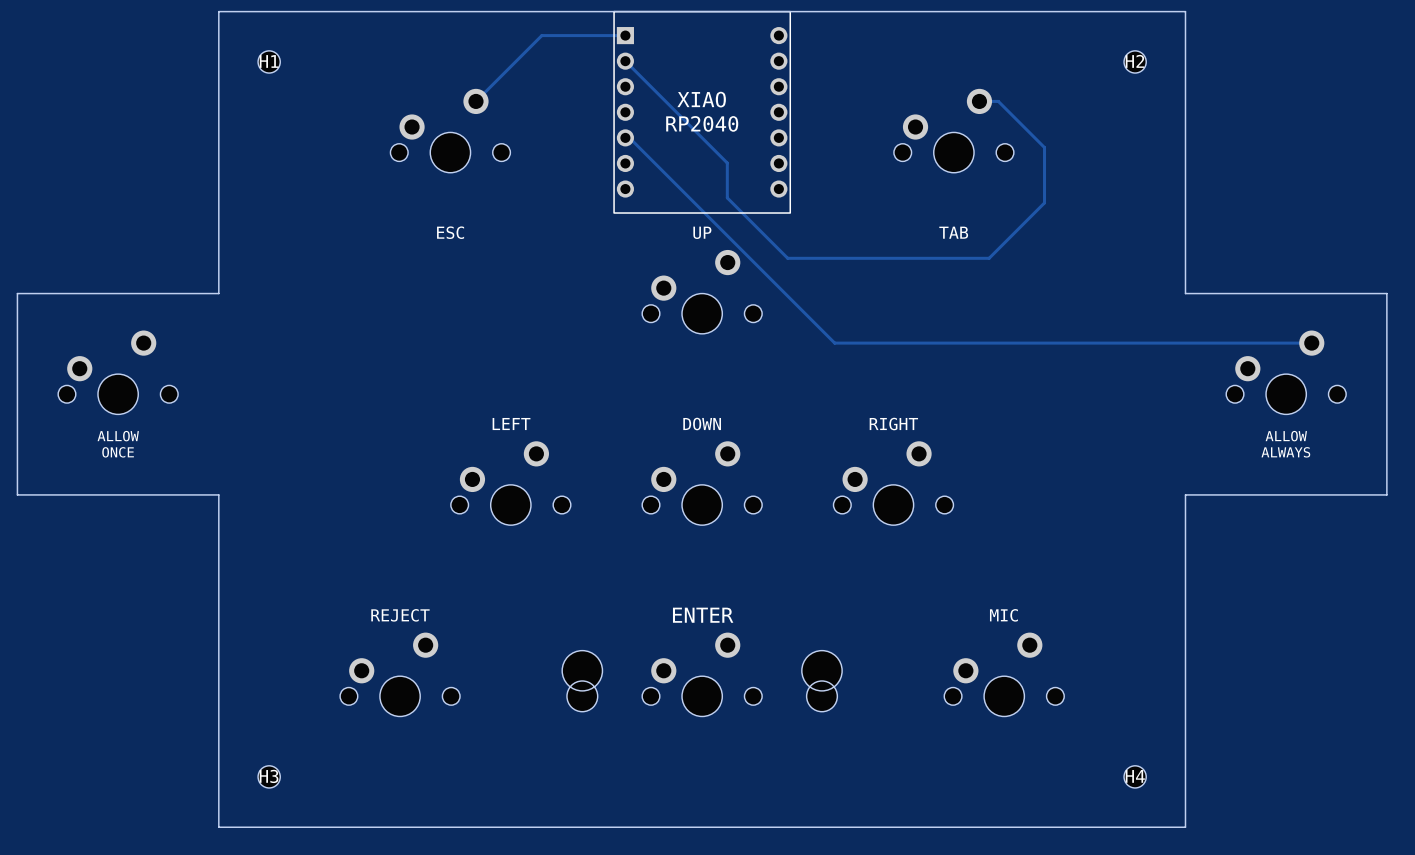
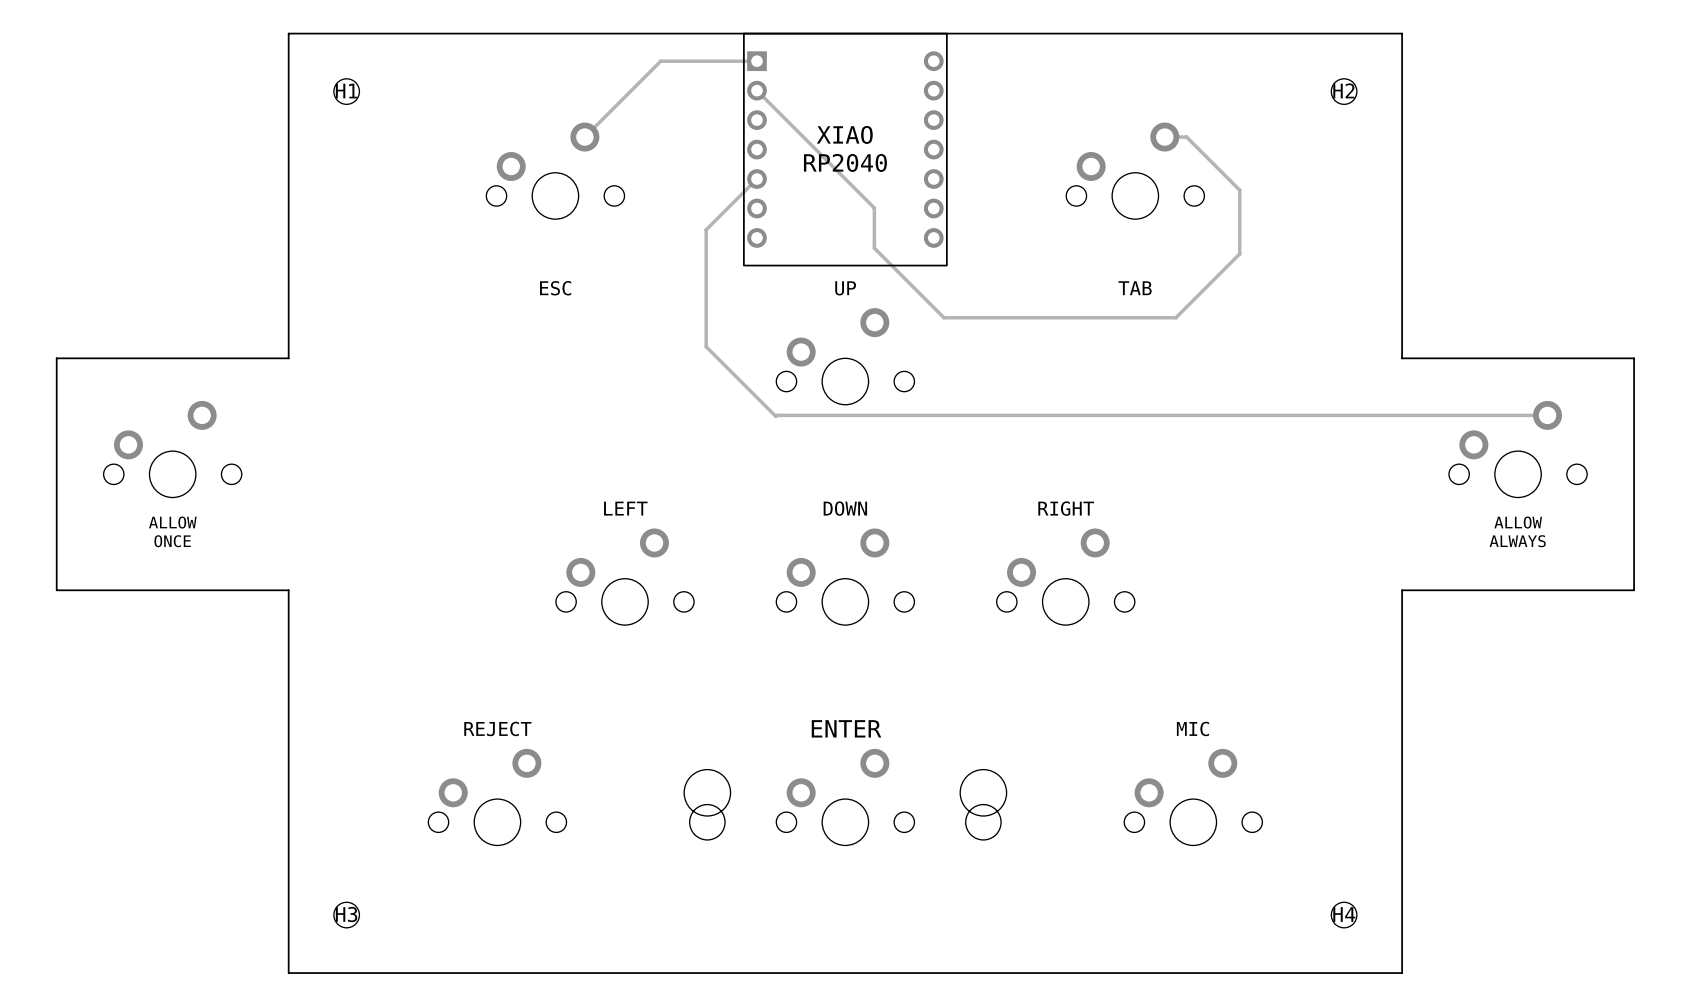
track: (629, 137) (834, 343) -> (757, 179) (706, 229) (706, 346) (775, 416) (998, 415)

